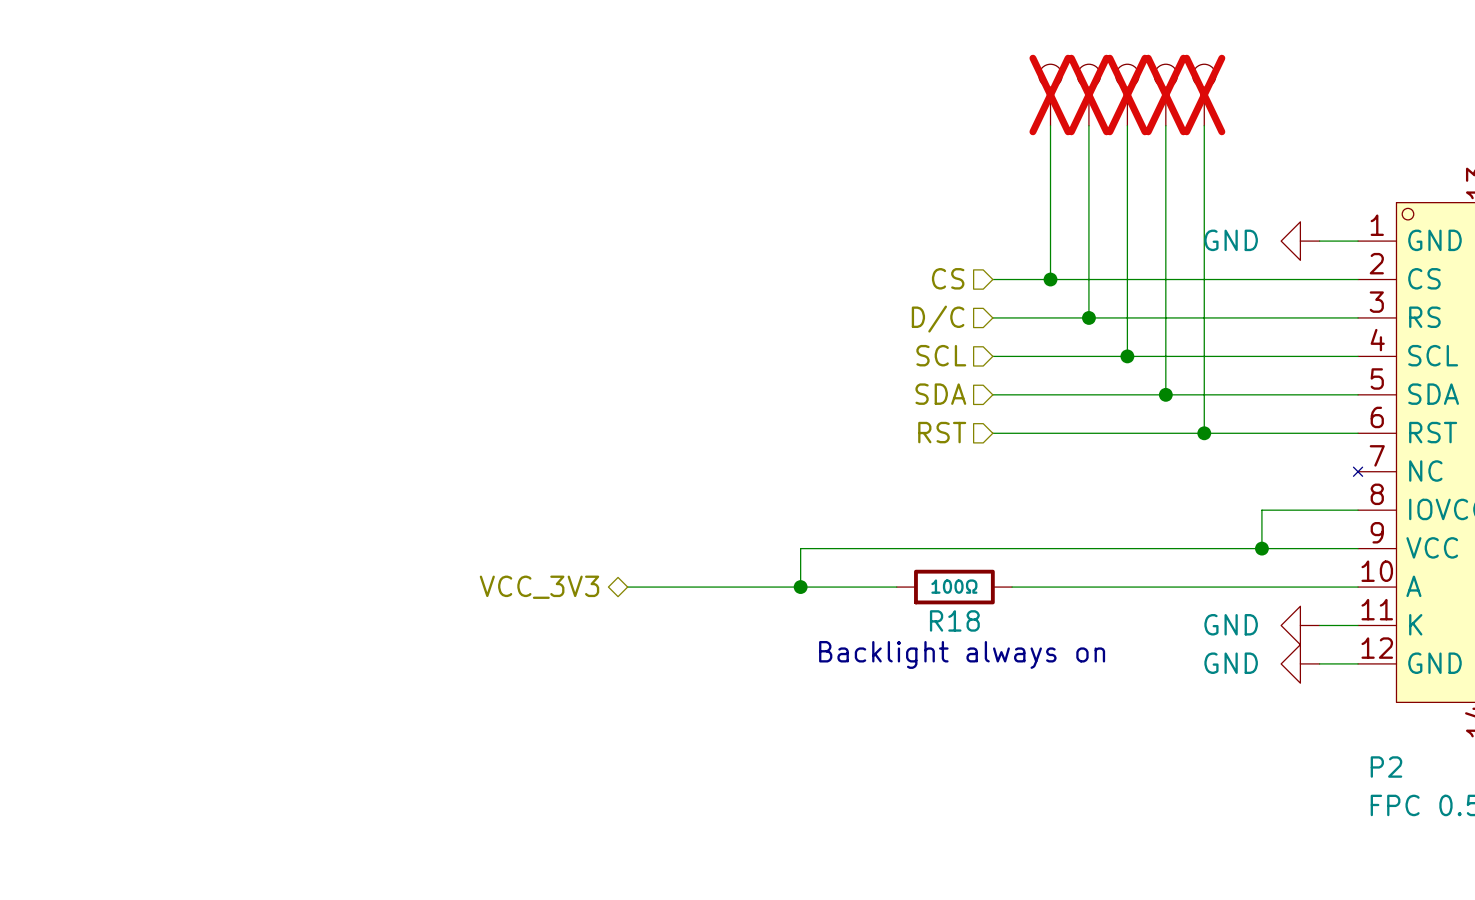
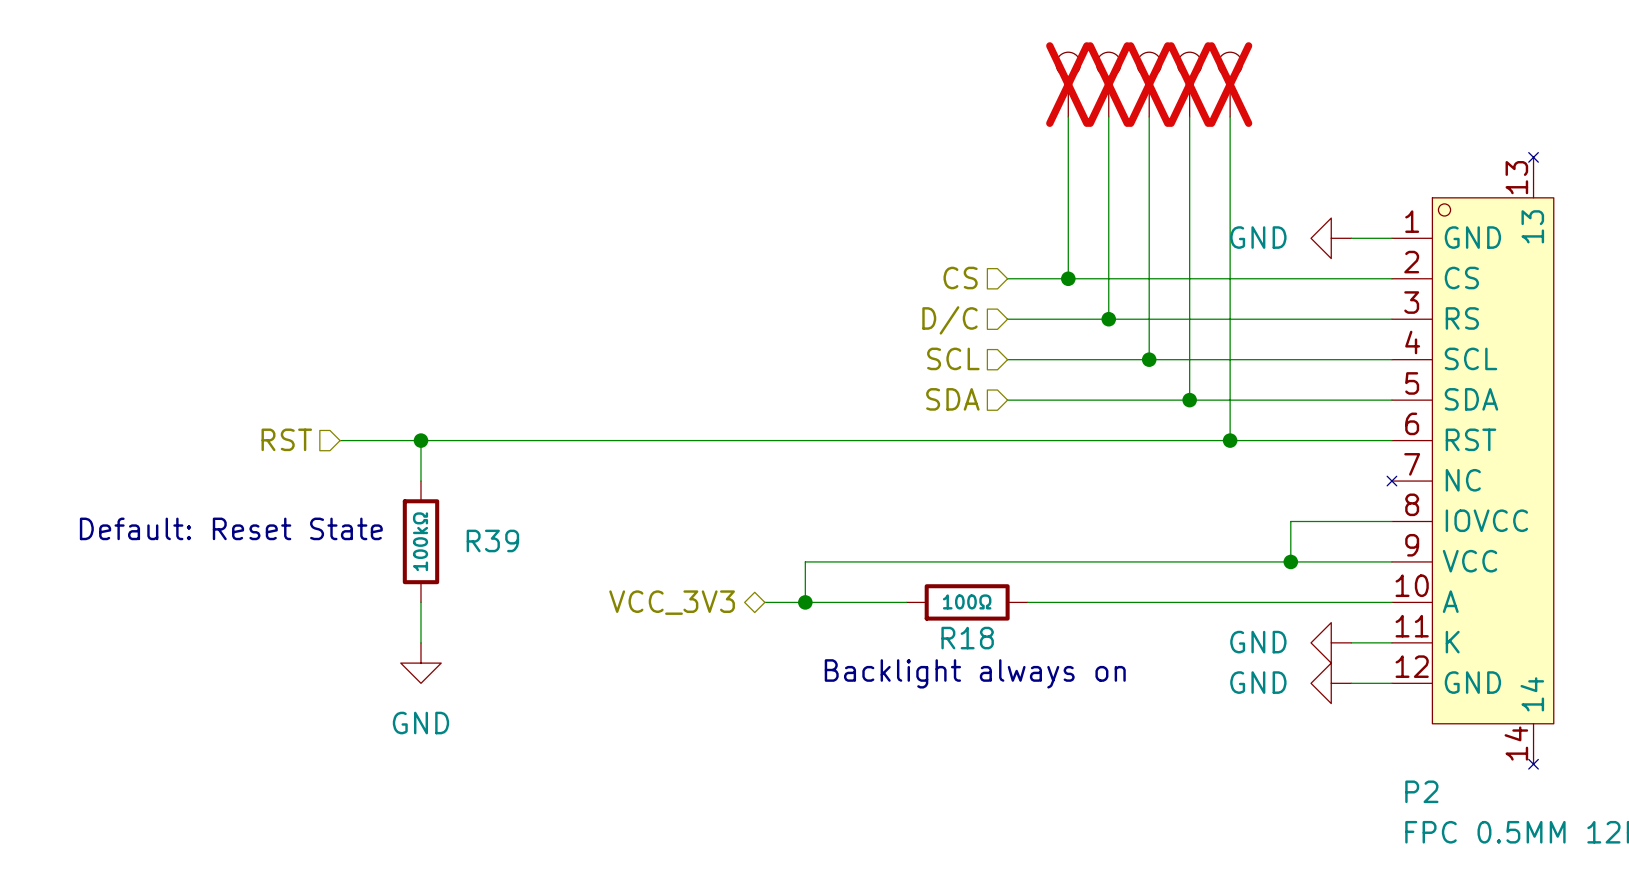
hierarchical label: none -> RST (286, 439)
hierarchical label: RST (942, 432) -> none
wire: none -> (340, 440) (1007, 440)
wire: none -> (420, 440) (420, 481)
junction: none -> (420, 440)
text: none -> Default: Reset State (231, 528)
R39: none -> 100kΩ (420, 541)
wire: none -> (420, 602) (420, 642)
hierarchical label position: VCC_3V3 (539, 587) -> VCC_3V3 (672, 602)
wire: (627, 587) (762, 587) -> none
power symbol: none -> GND (420, 663)

